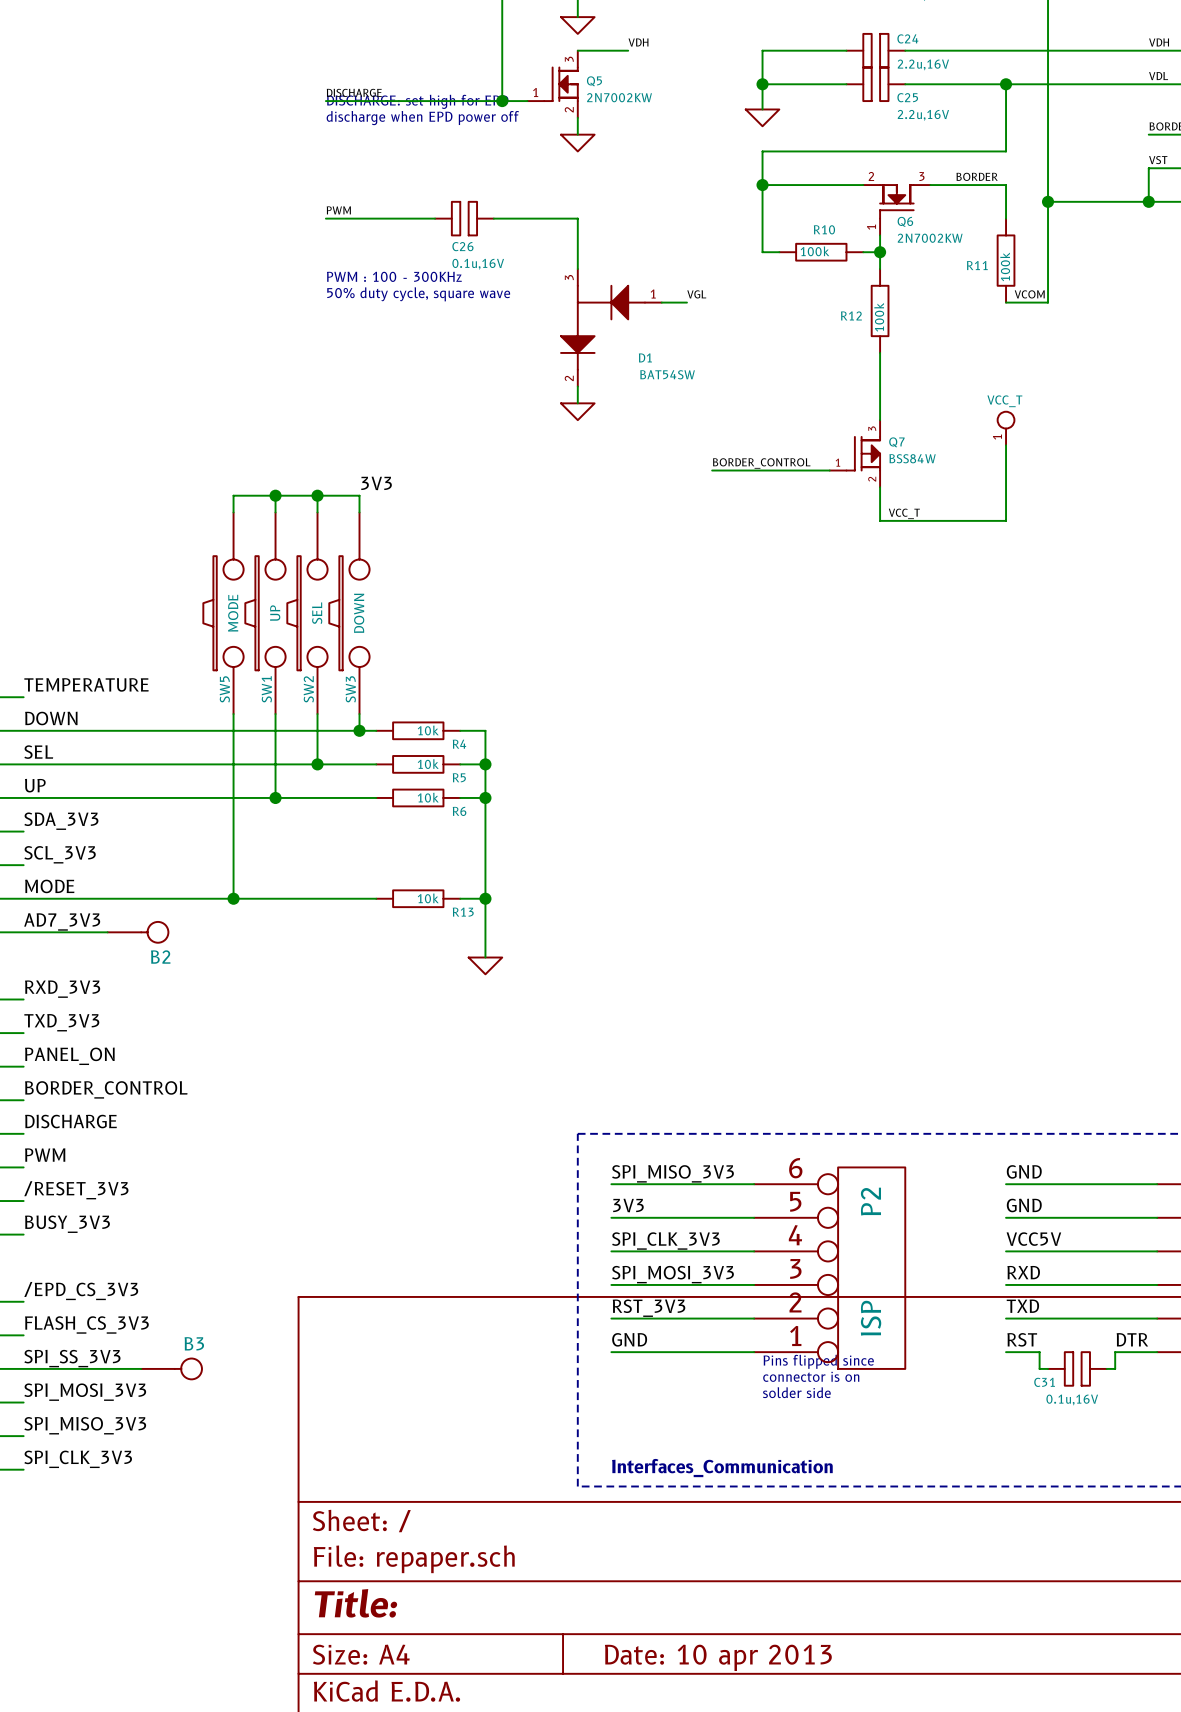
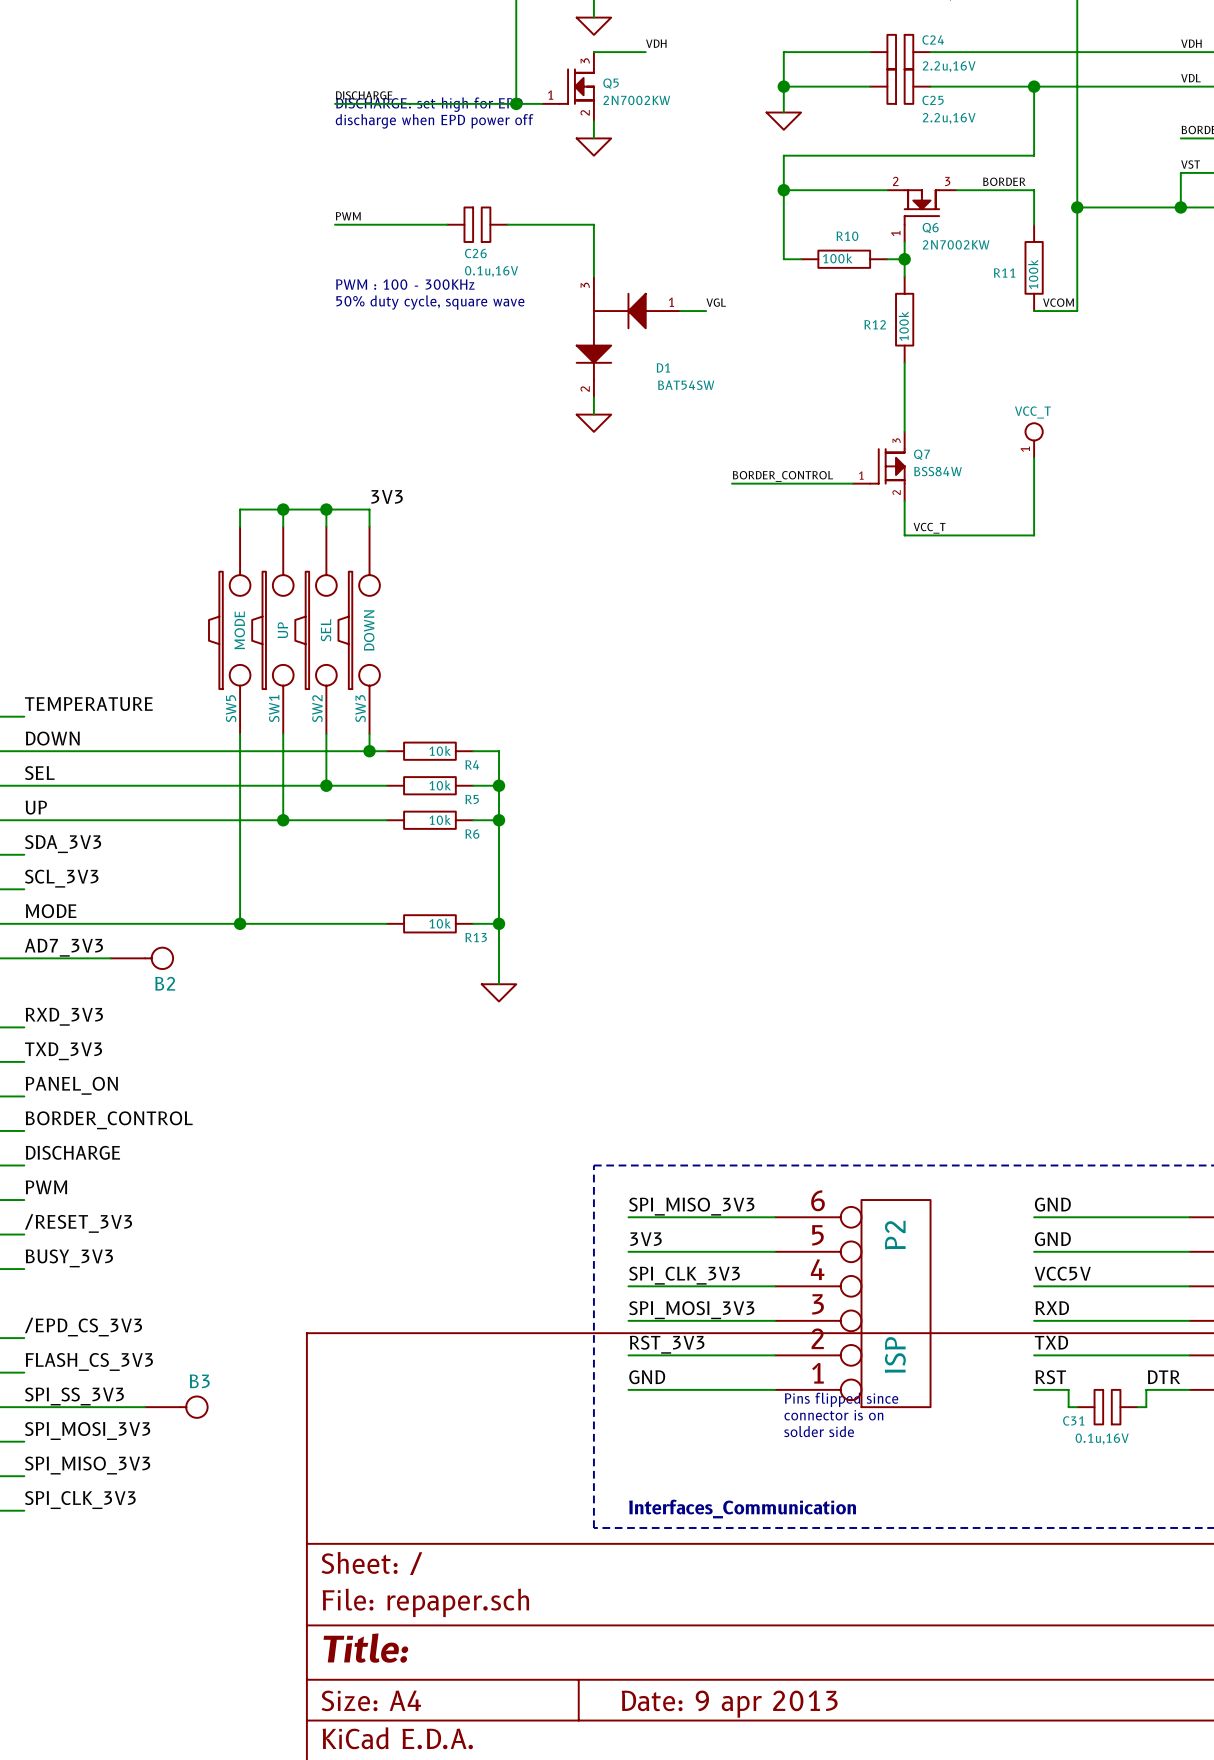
title block: Date: 10 apr 2013 (718, 1657) -> Date: 9 apr 2013 (729, 1704)

